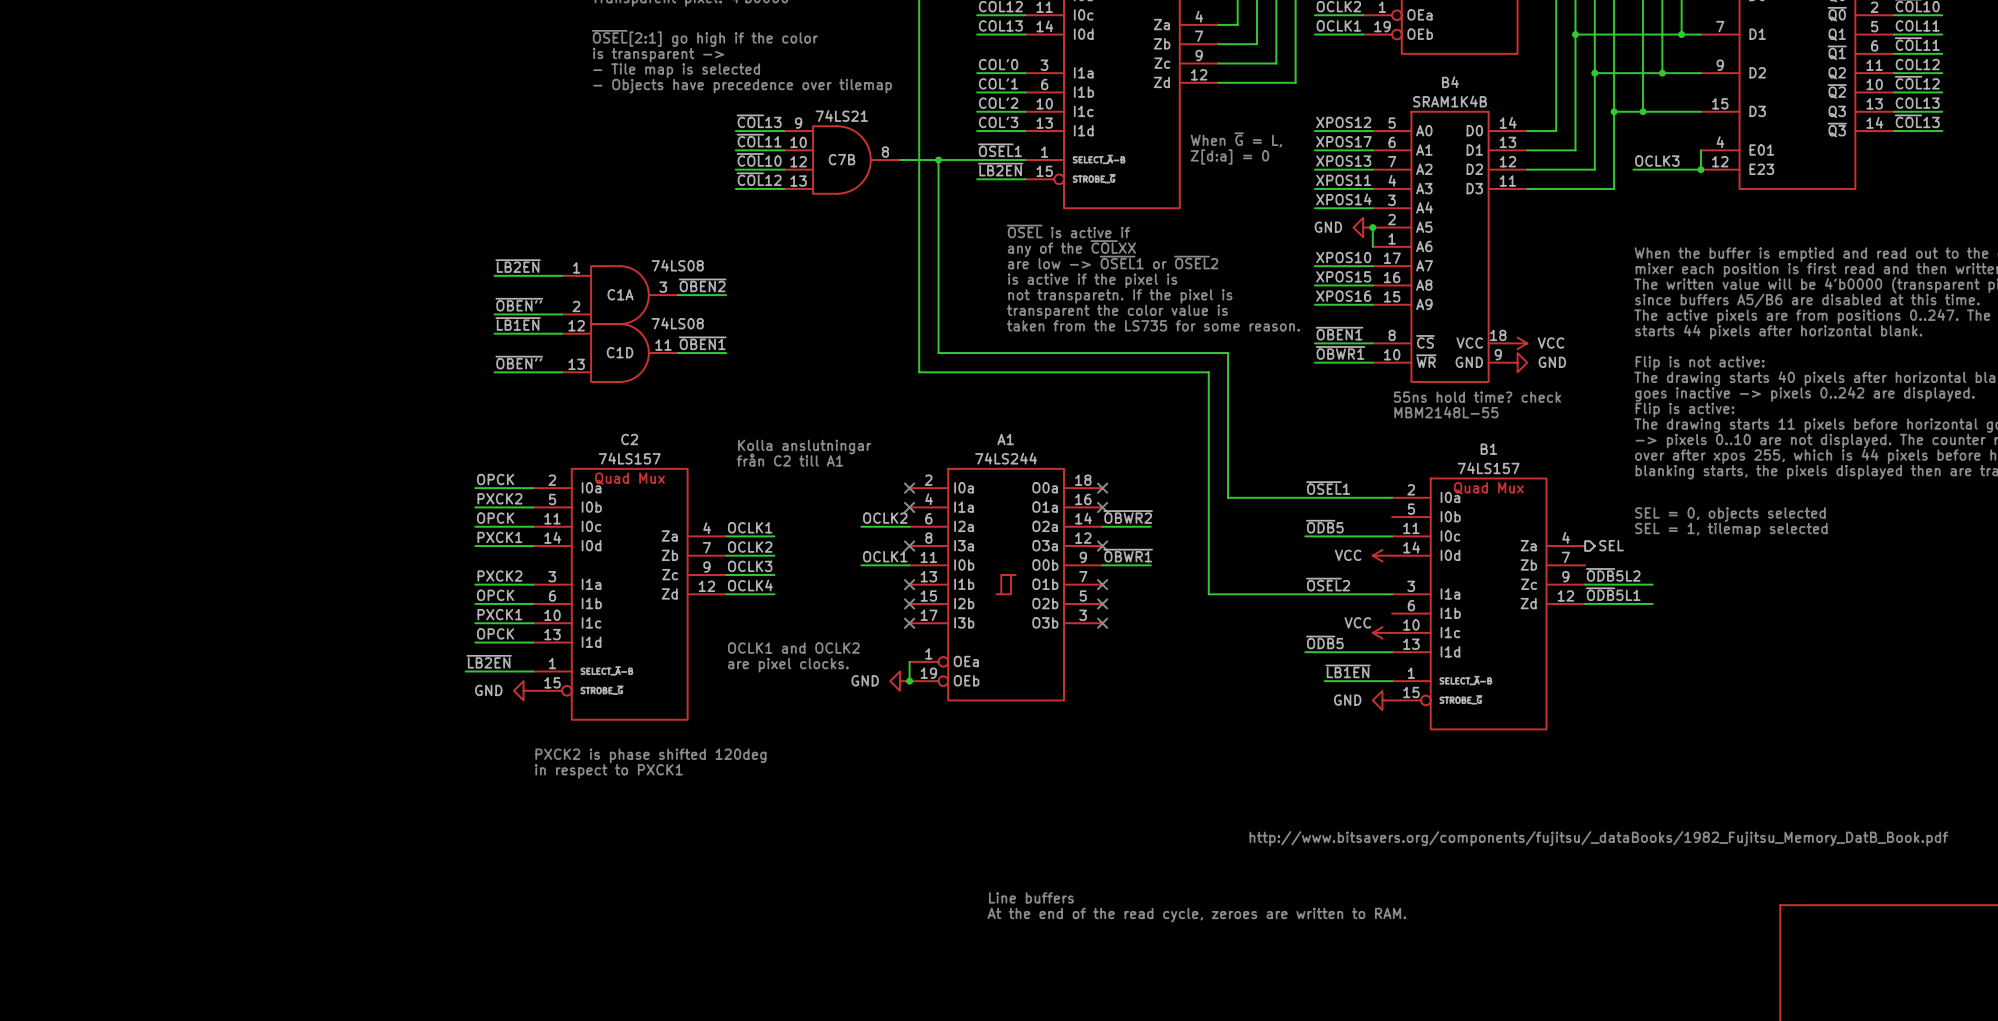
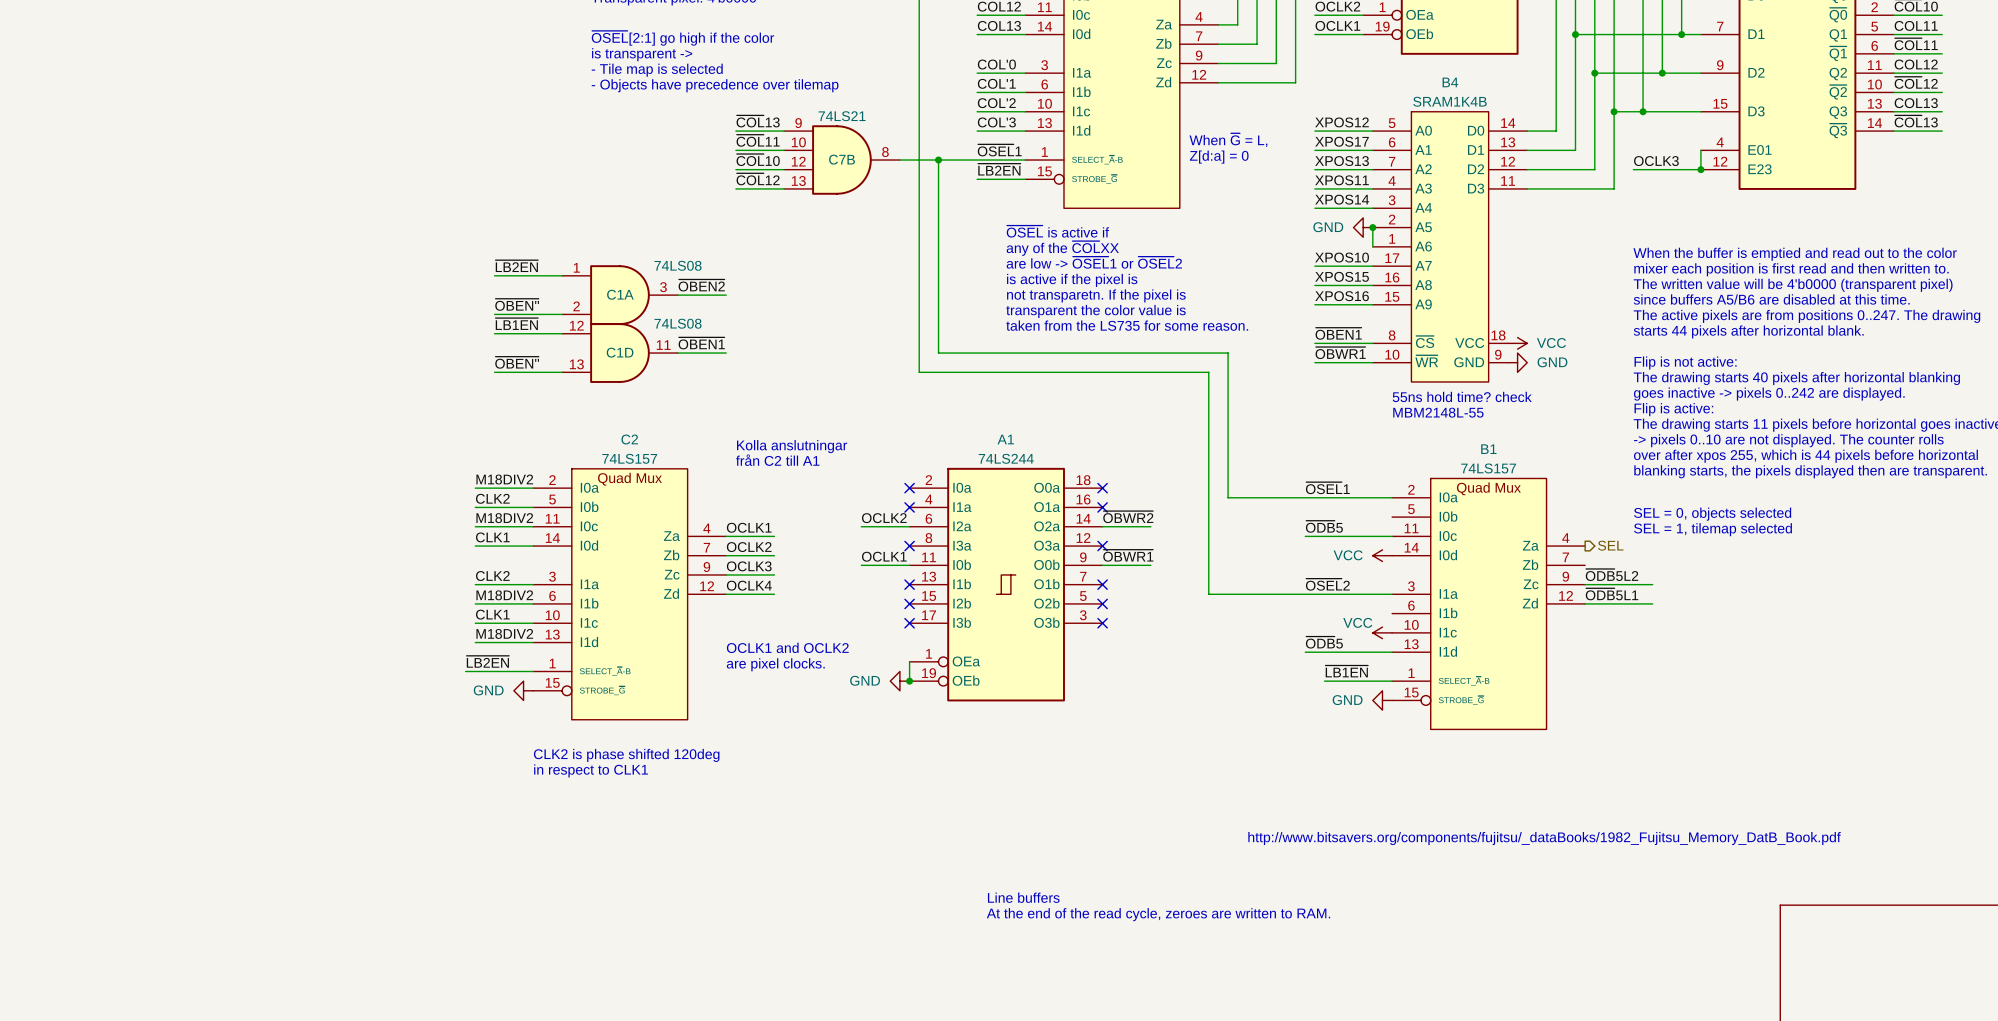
label: OPCK (495, 479) -> M18DIV2 (504, 479)
label: PXCK2 (499, 498) -> CLK2 (492, 498)
label: OPCK (495, 518) -> M18DIV2 (504, 518)
label: PXCK1 (499, 537) -> CLK1 (492, 537)
label: PXCK2 (499, 576) -> CLK2 (492, 576)
label: OPCK (495, 595) -> M18DIV2 (504, 595)
label: PXCK1 (499, 614) -> CLK1 (492, 614)
label: OPCK (495, 633) -> M18DIV2 (504, 633)
text: PXCK2 is phase shifted 120deg (650, 755) -> CLK2 is phase shifted 120deg (626, 755)
text: in respect to PXCK1 (608, 771) -> in respect to CLK1 (591, 770)

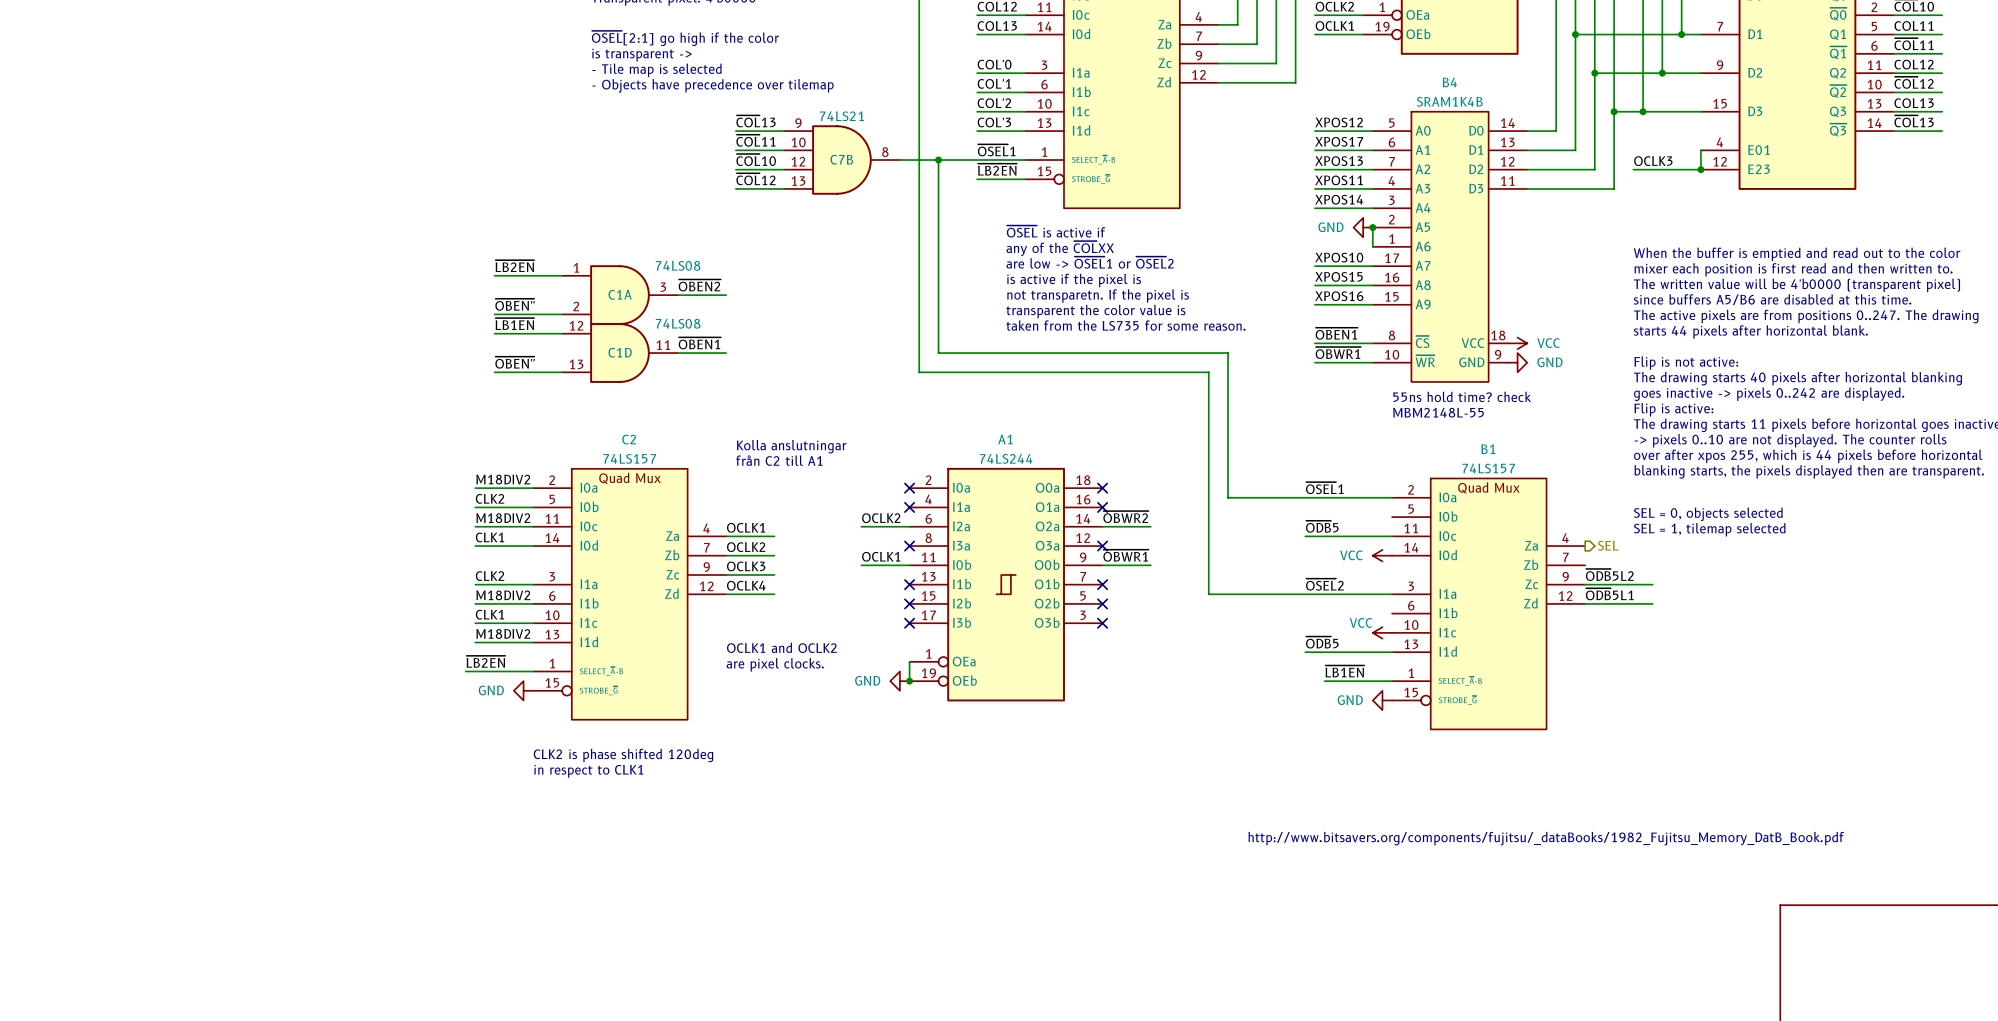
text: When ~{G} = L, (1228, 140) -> none
text: Z[d:a] = 0 (1219, 157) -> none
text: Line buffers (1023, 897) -> none
text: At the end of the read cycle, zeroes are written to RAM. (1158, 914) -> none

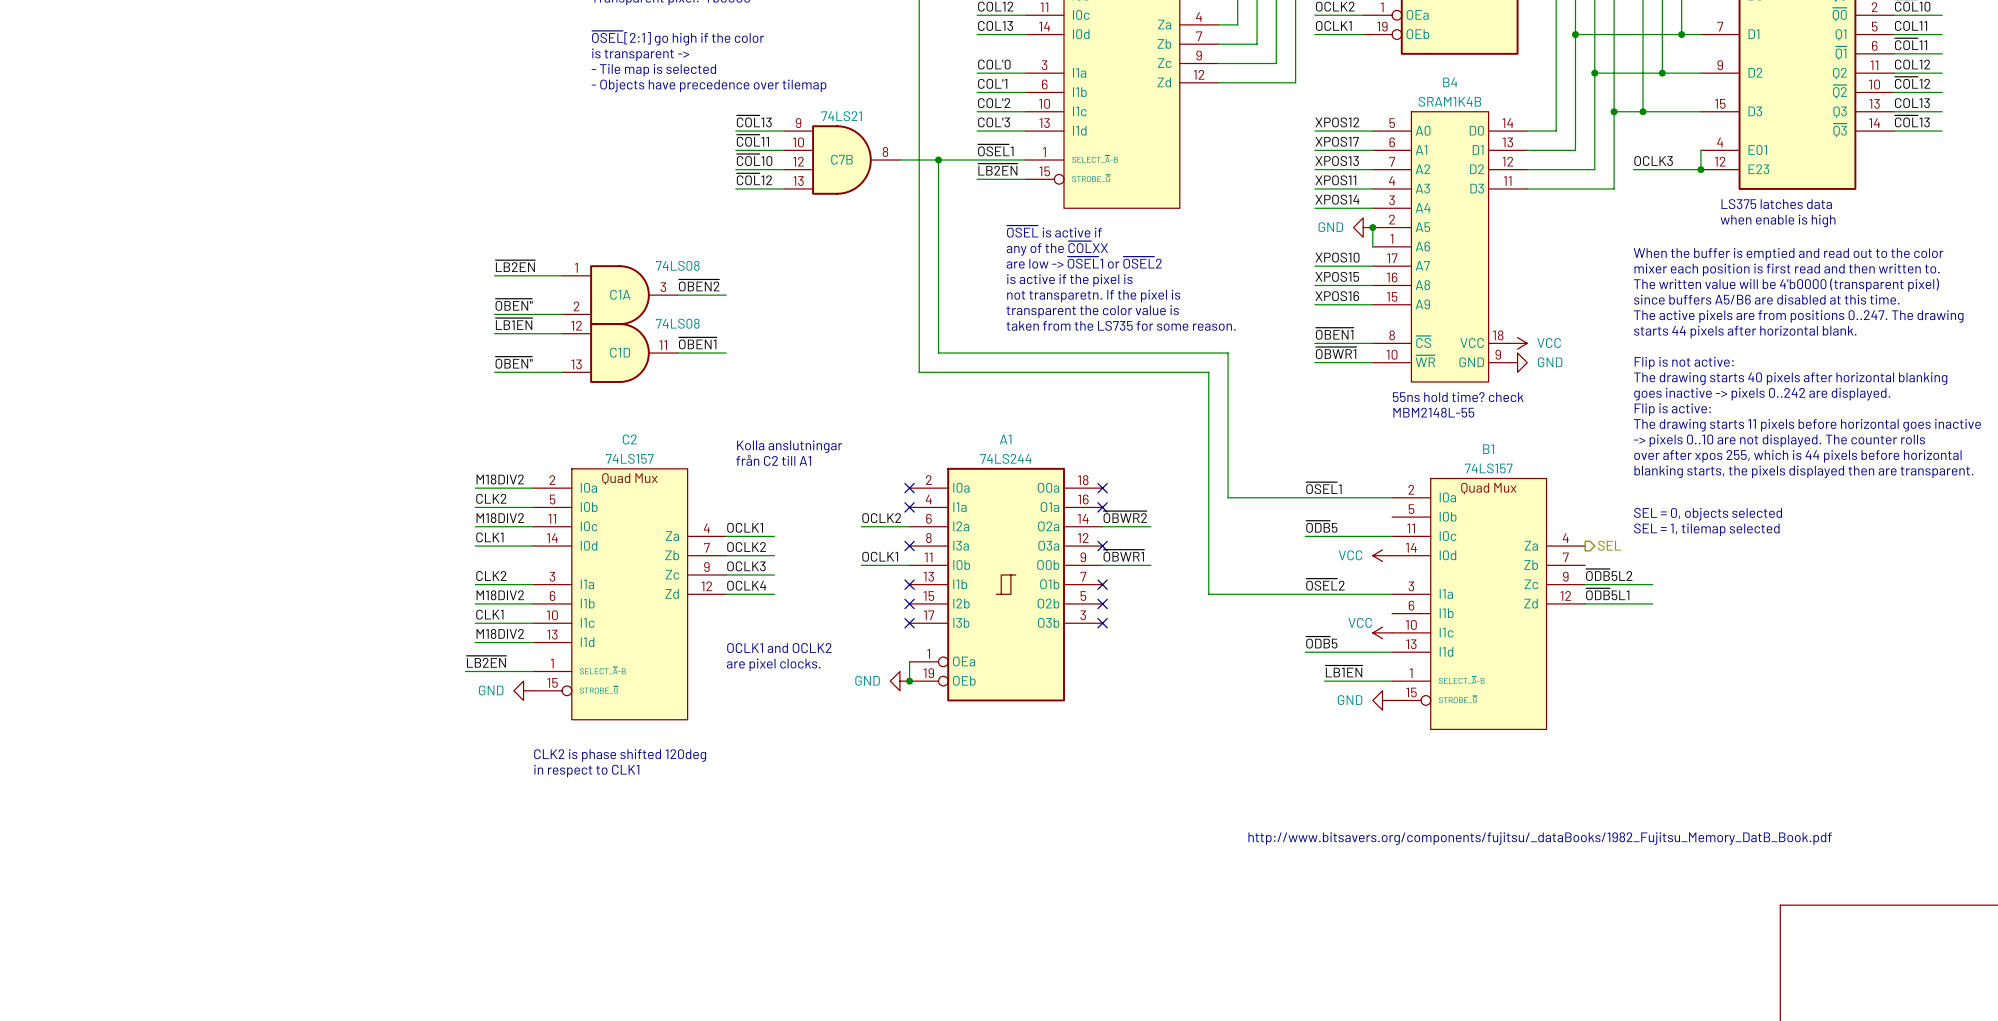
text: none -> LS375 latches data (1776, 204)
text: none -> when enable is high (1778, 220)

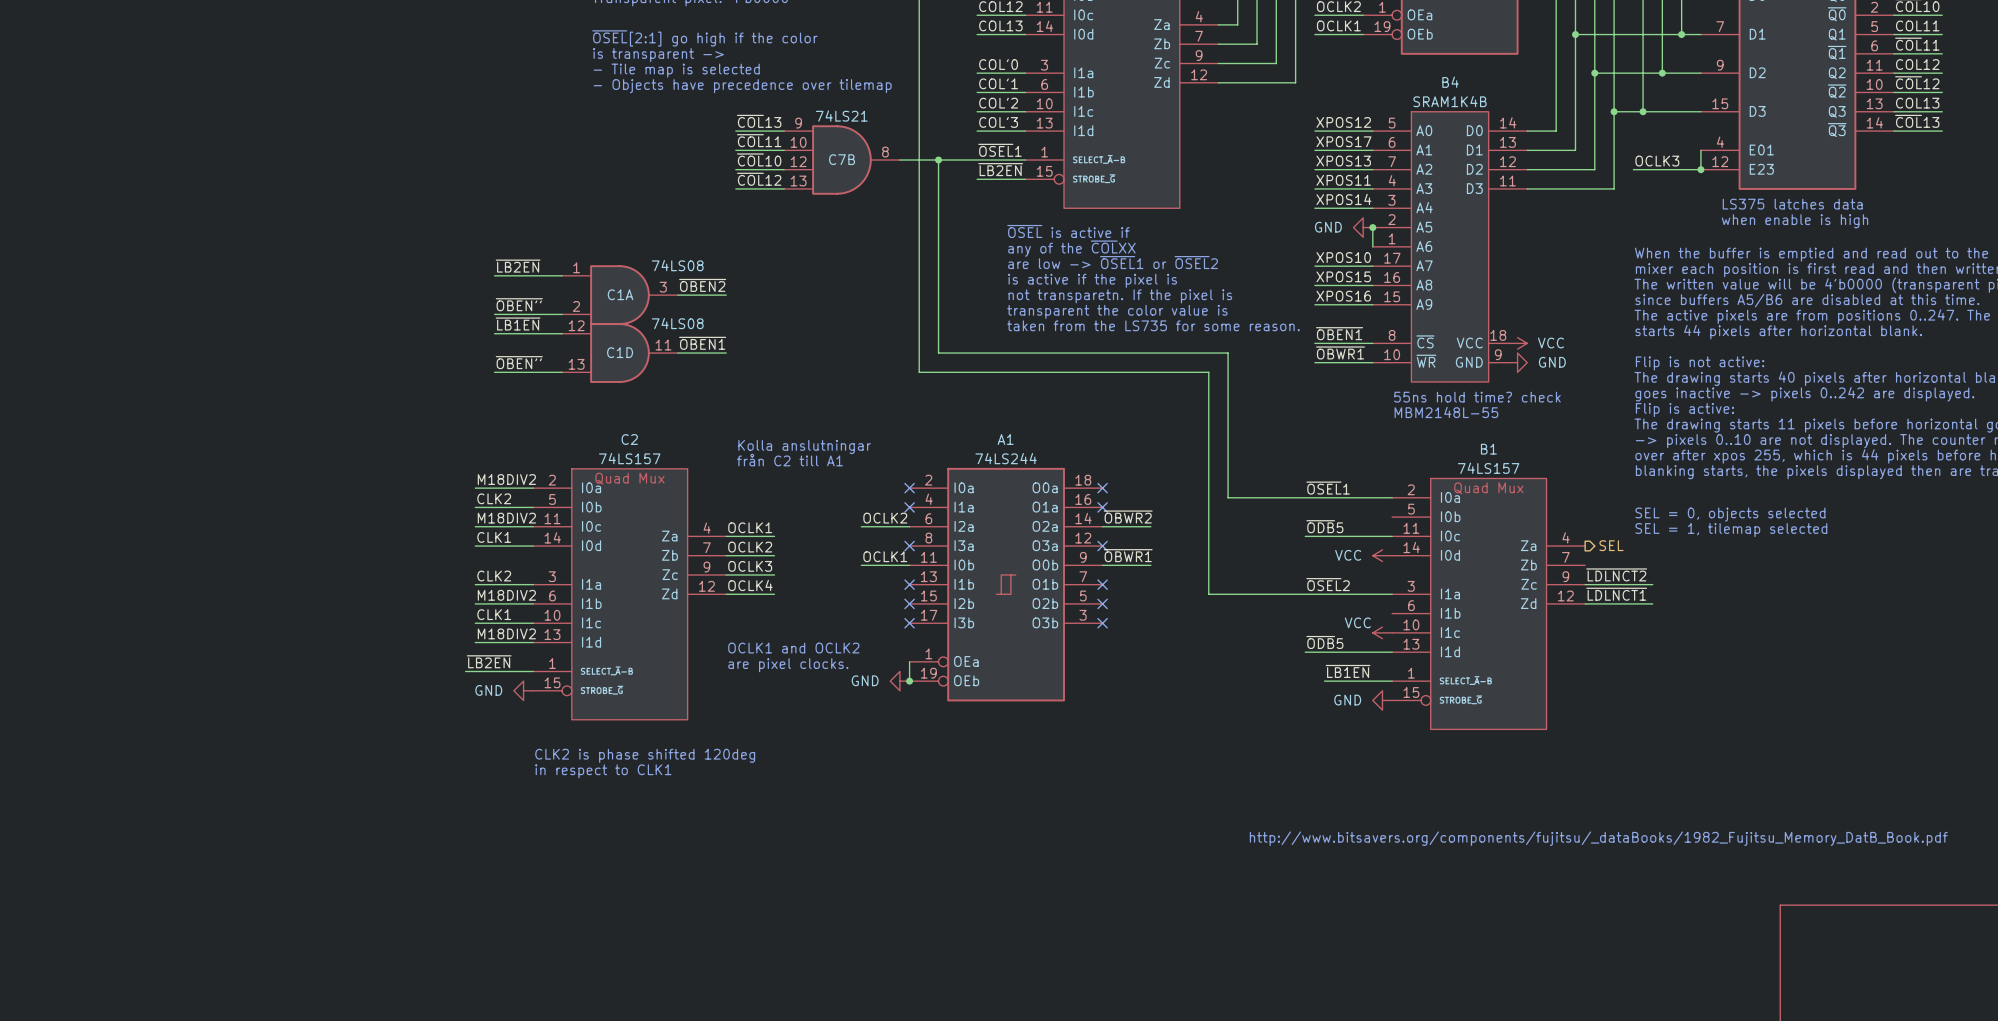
label: ~{ODB}5L2 (1609, 574) -> ~{LDLNCT2} (1616, 574)
label: ~{ODB}5L1 (1607, 594) -> ~{LDLNCT1} (1616, 594)

